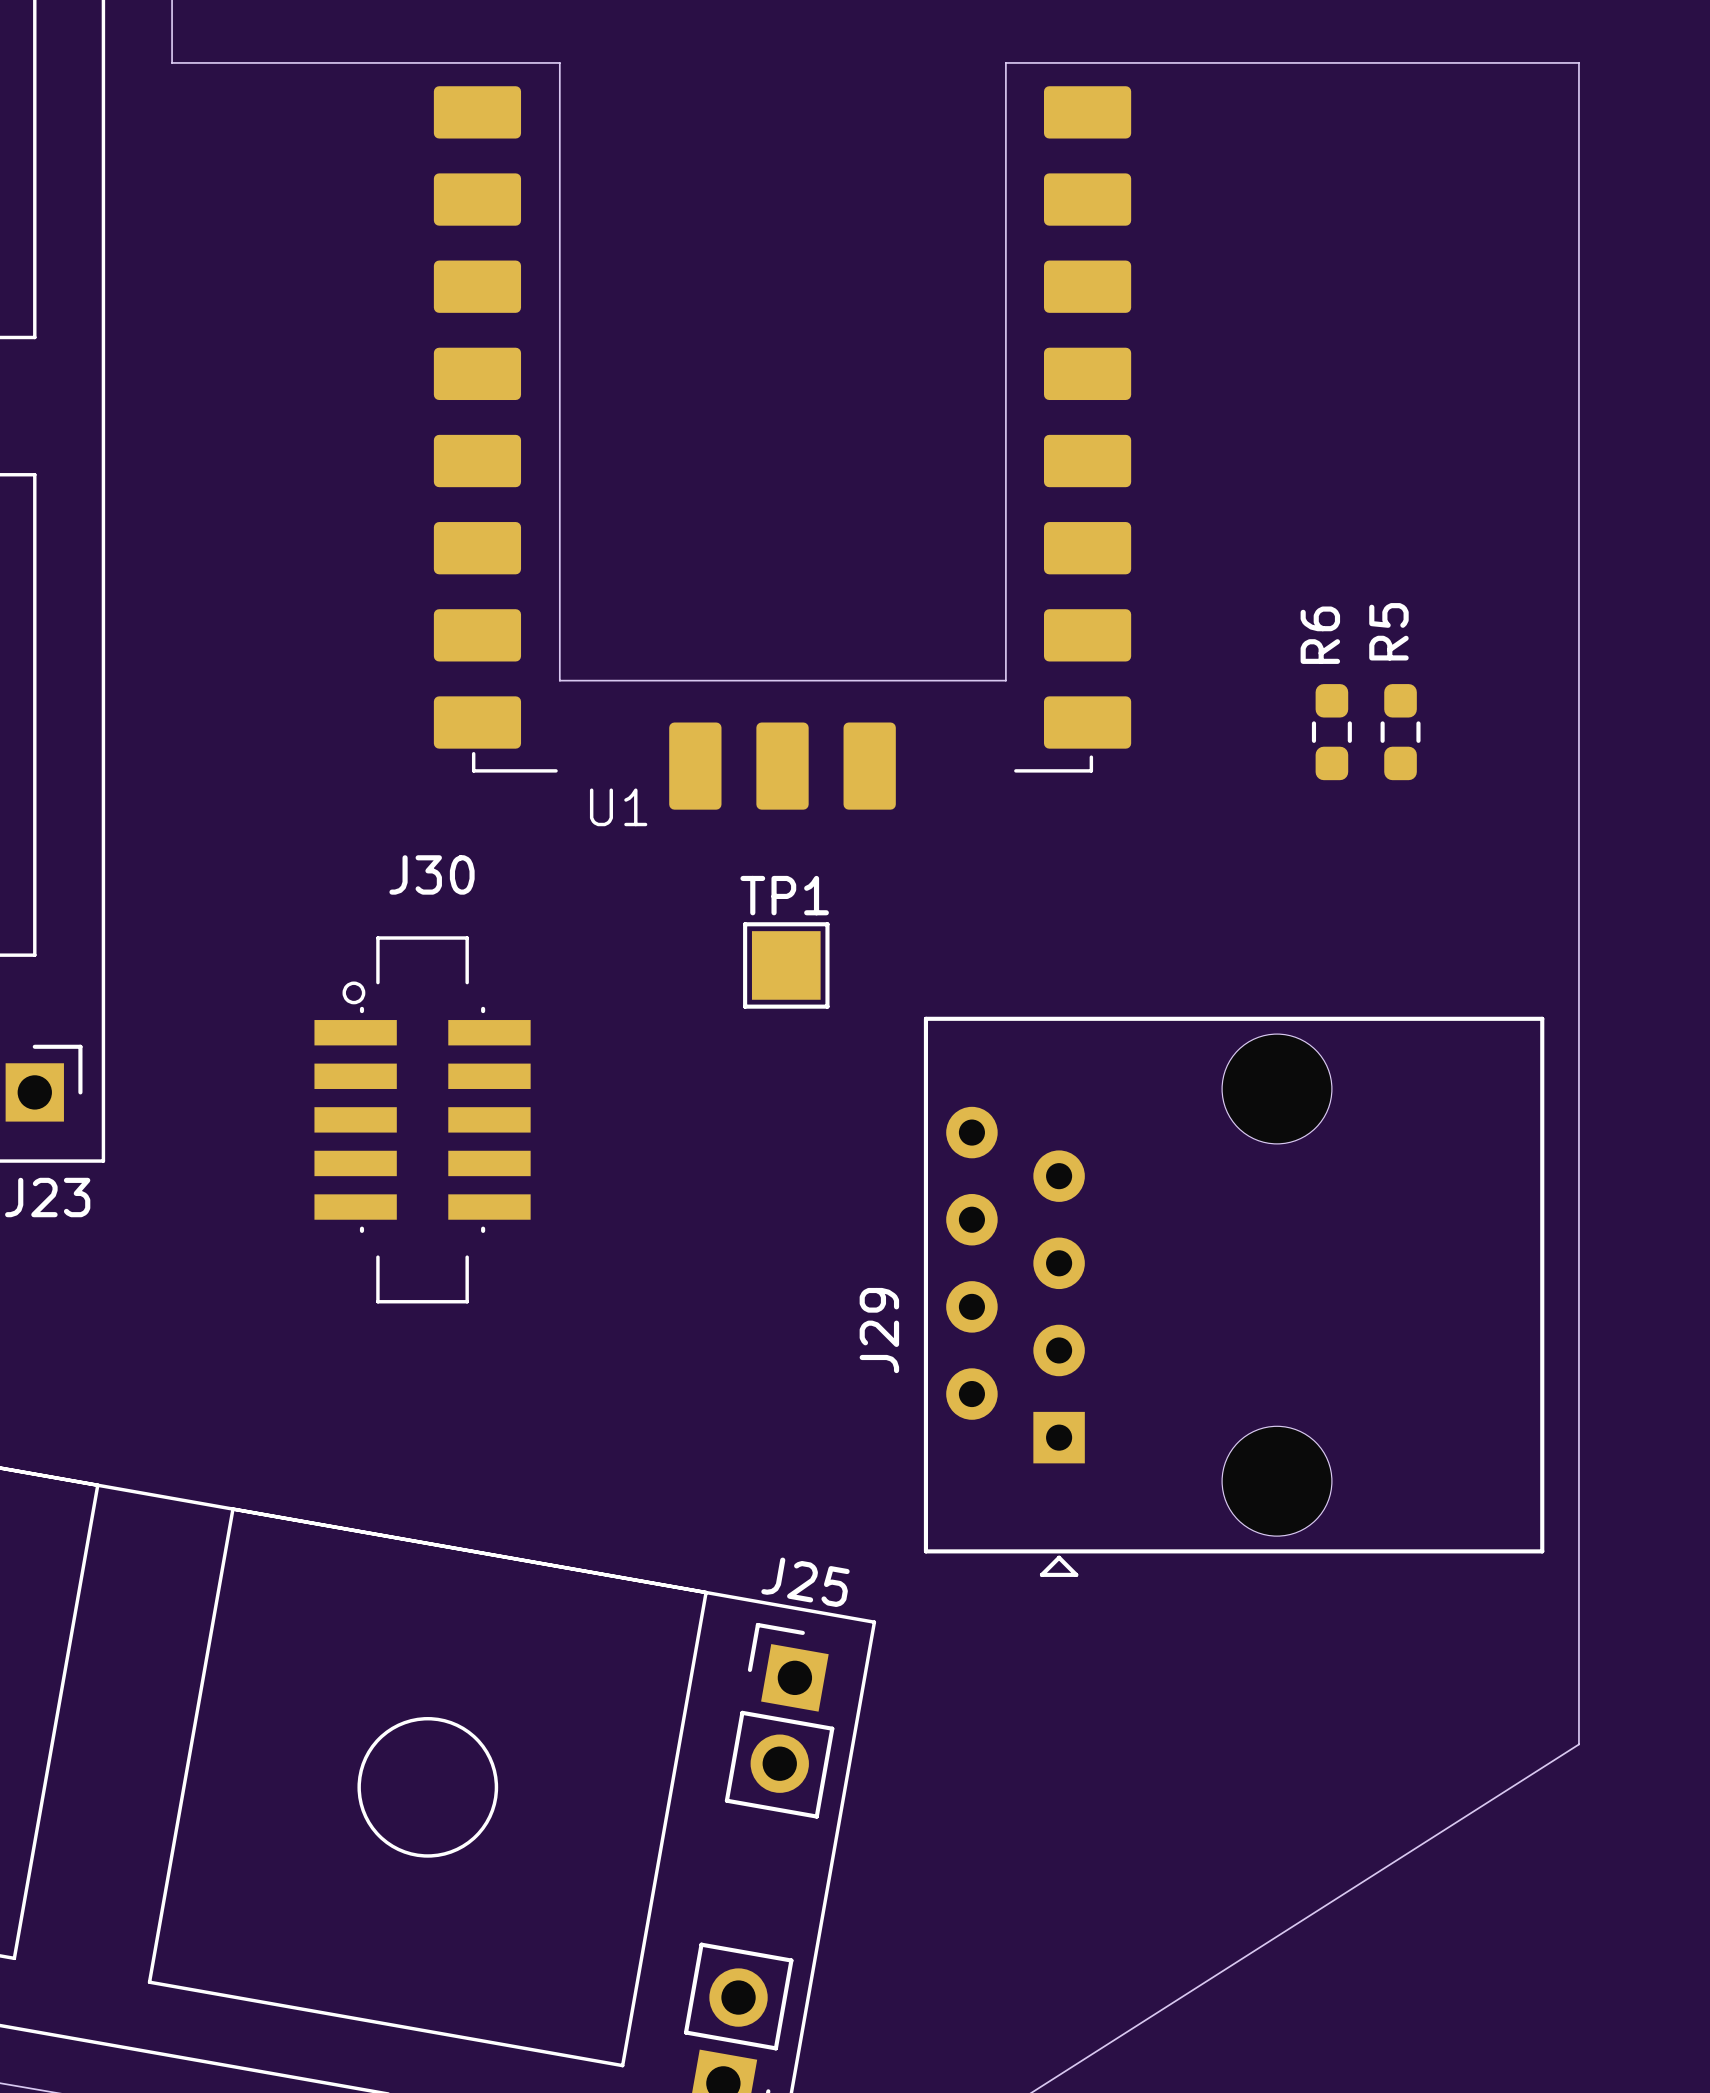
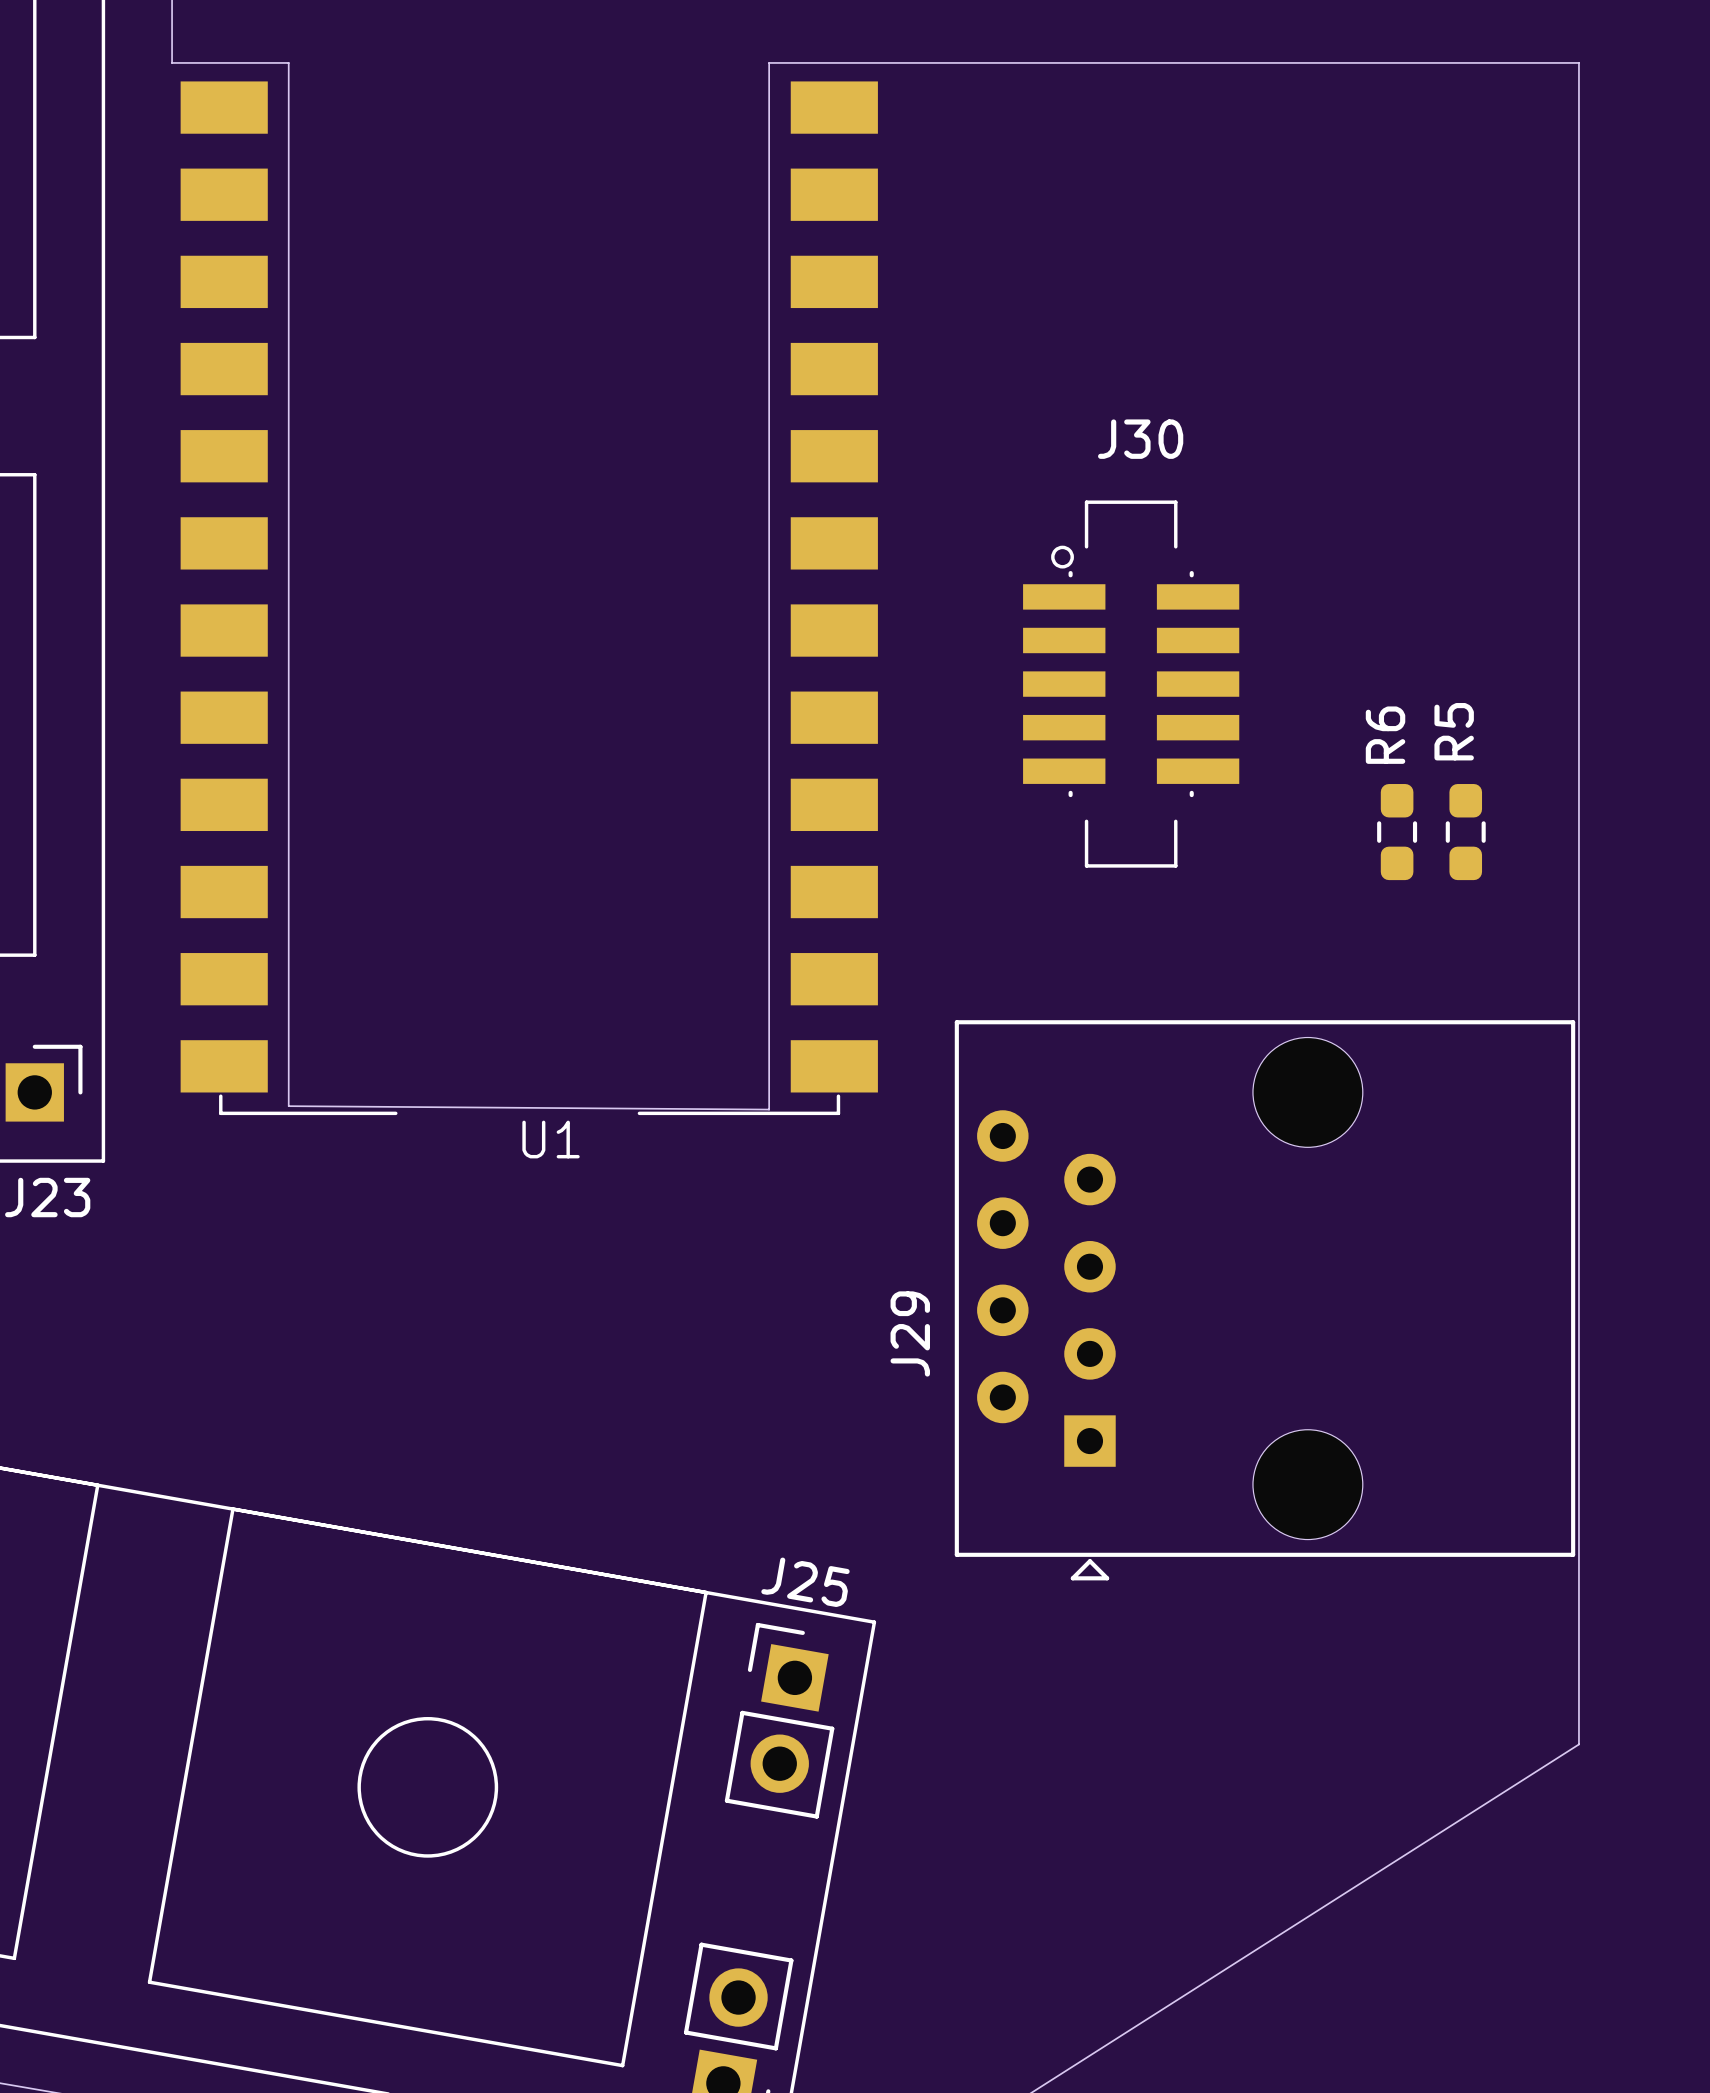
board edge: (288, 62) (559, 62) (559, 680) (1005, 680) (1005, 62) -> (288, 62) (288, 1106) (769, 1109) (769, 62) (1005, 62)
U1 footprint: [433, 86, 1132, 810] -> [180, 81, 878, 1116]
R6 position: (1331, 732) -> (1397, 832)
R5 position: (1400, 732) -> (1465, 832)
U1 name position: U1 (618, 807) -> U1 (551, 1139)
TP1: (786, 965) -> none
J30 position: (422, 1119) -> (1131, 684)
J29 position: (1234, 1296) -> (1264, 1300)

